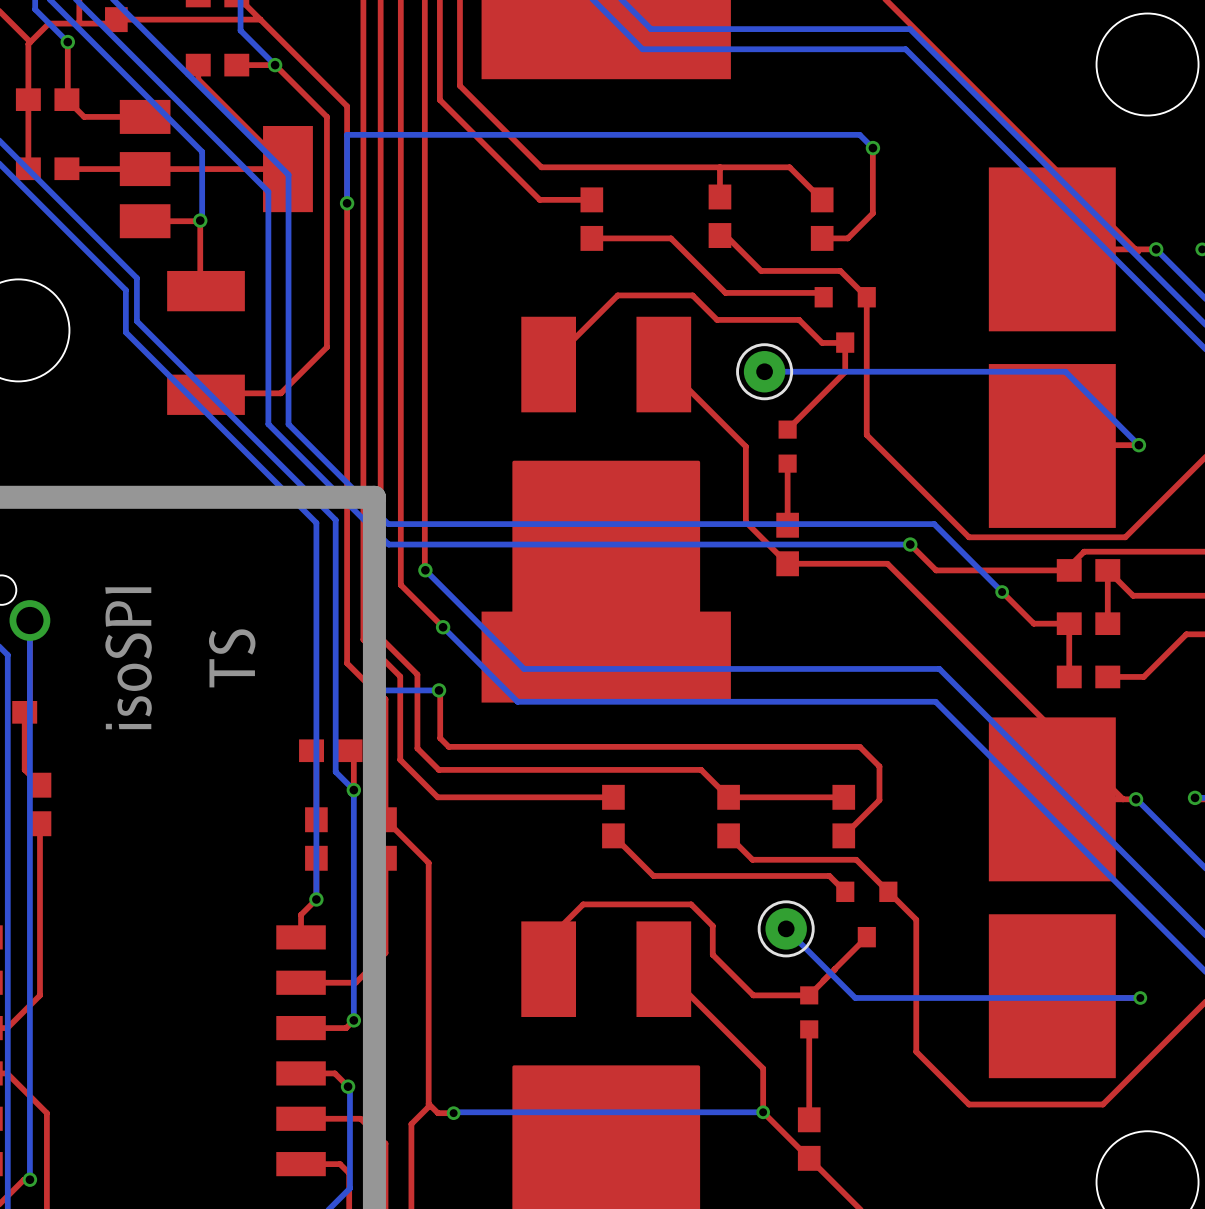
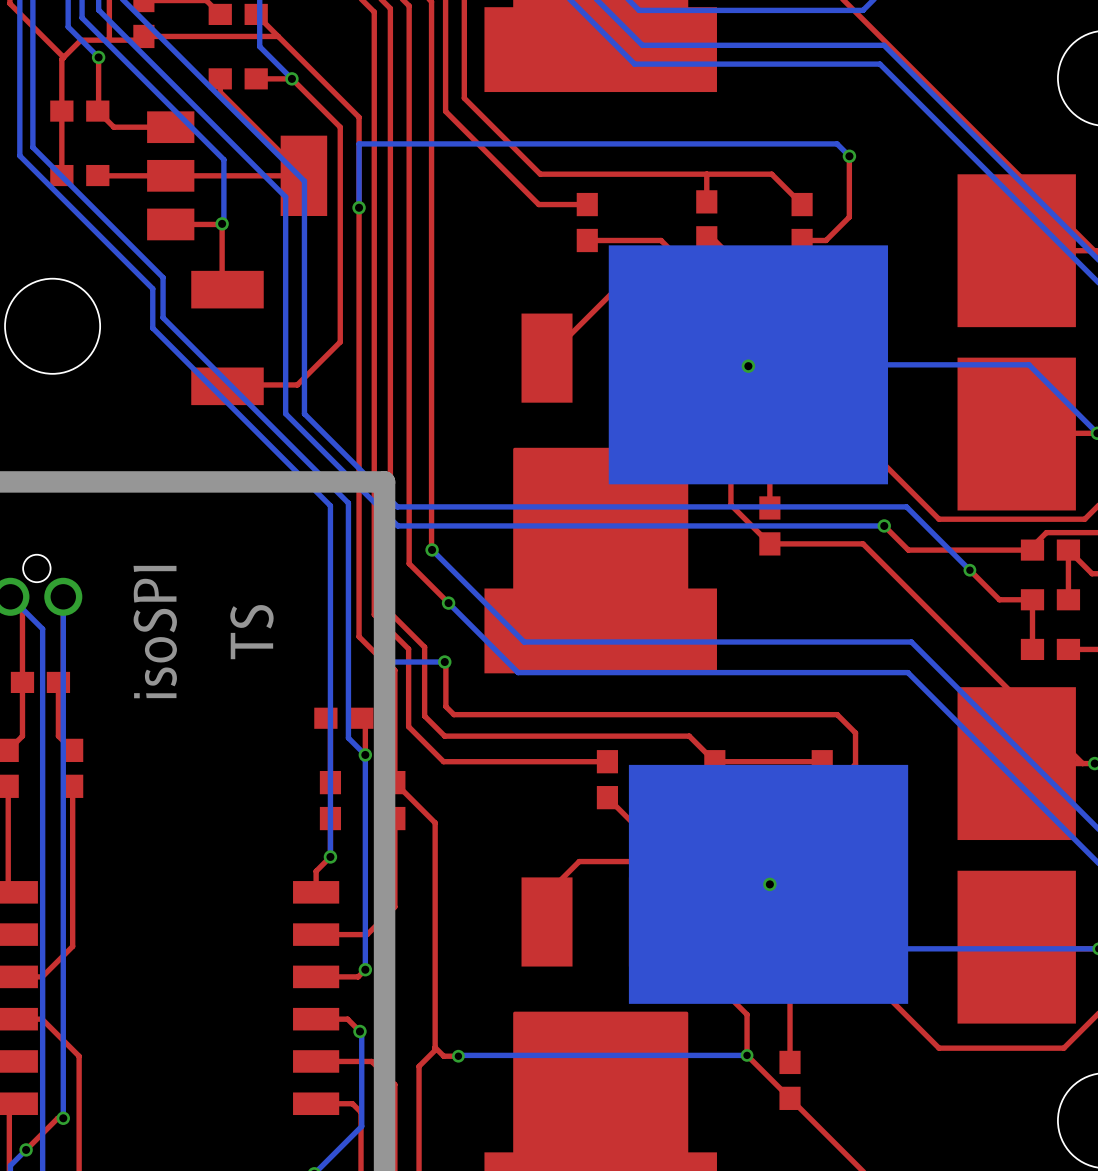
part footprint: [736, 343, 794, 401] -> [608, 245, 889, 485]
via: none -> (748, 366)
part footprint: [757, 900, 815, 958] -> [628, 764, 909, 1004]
via: none -> (769, 884)

